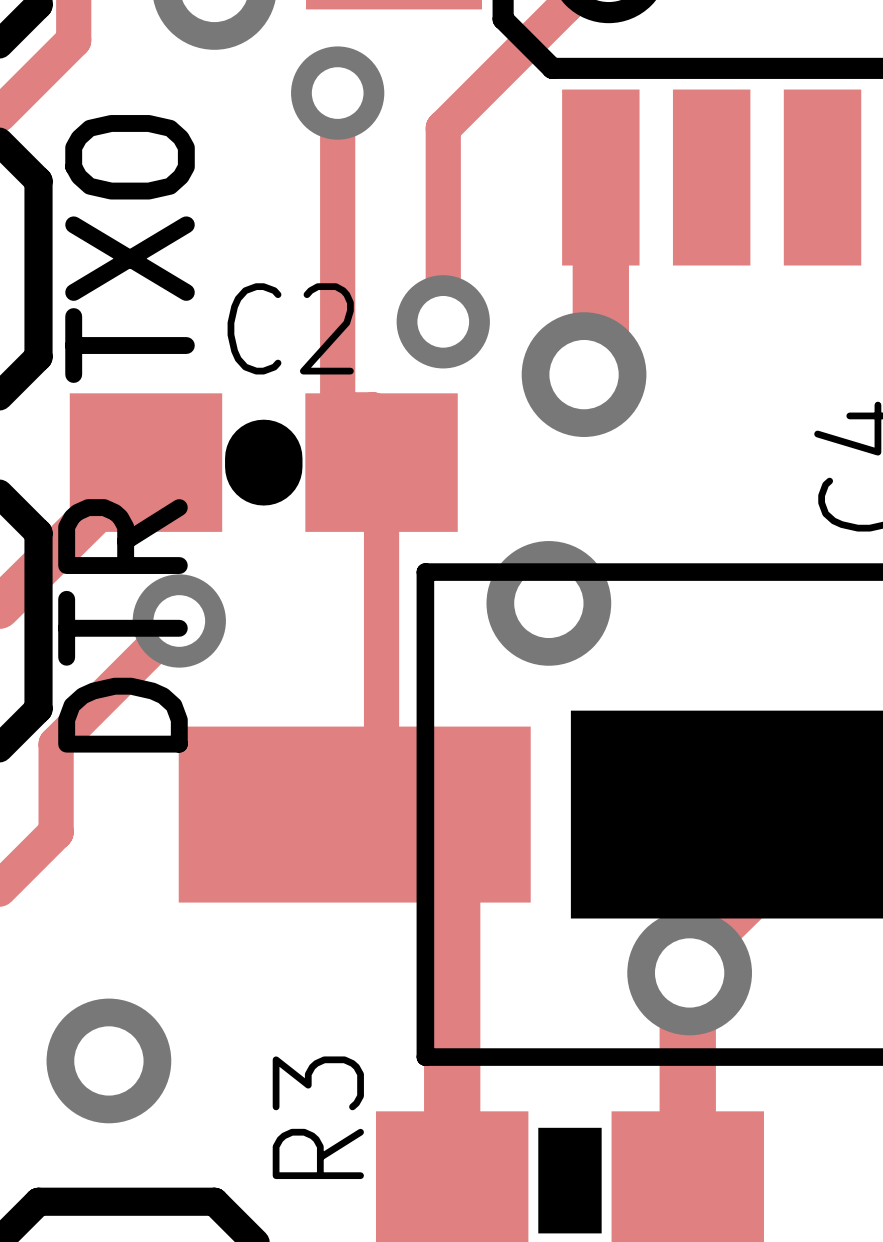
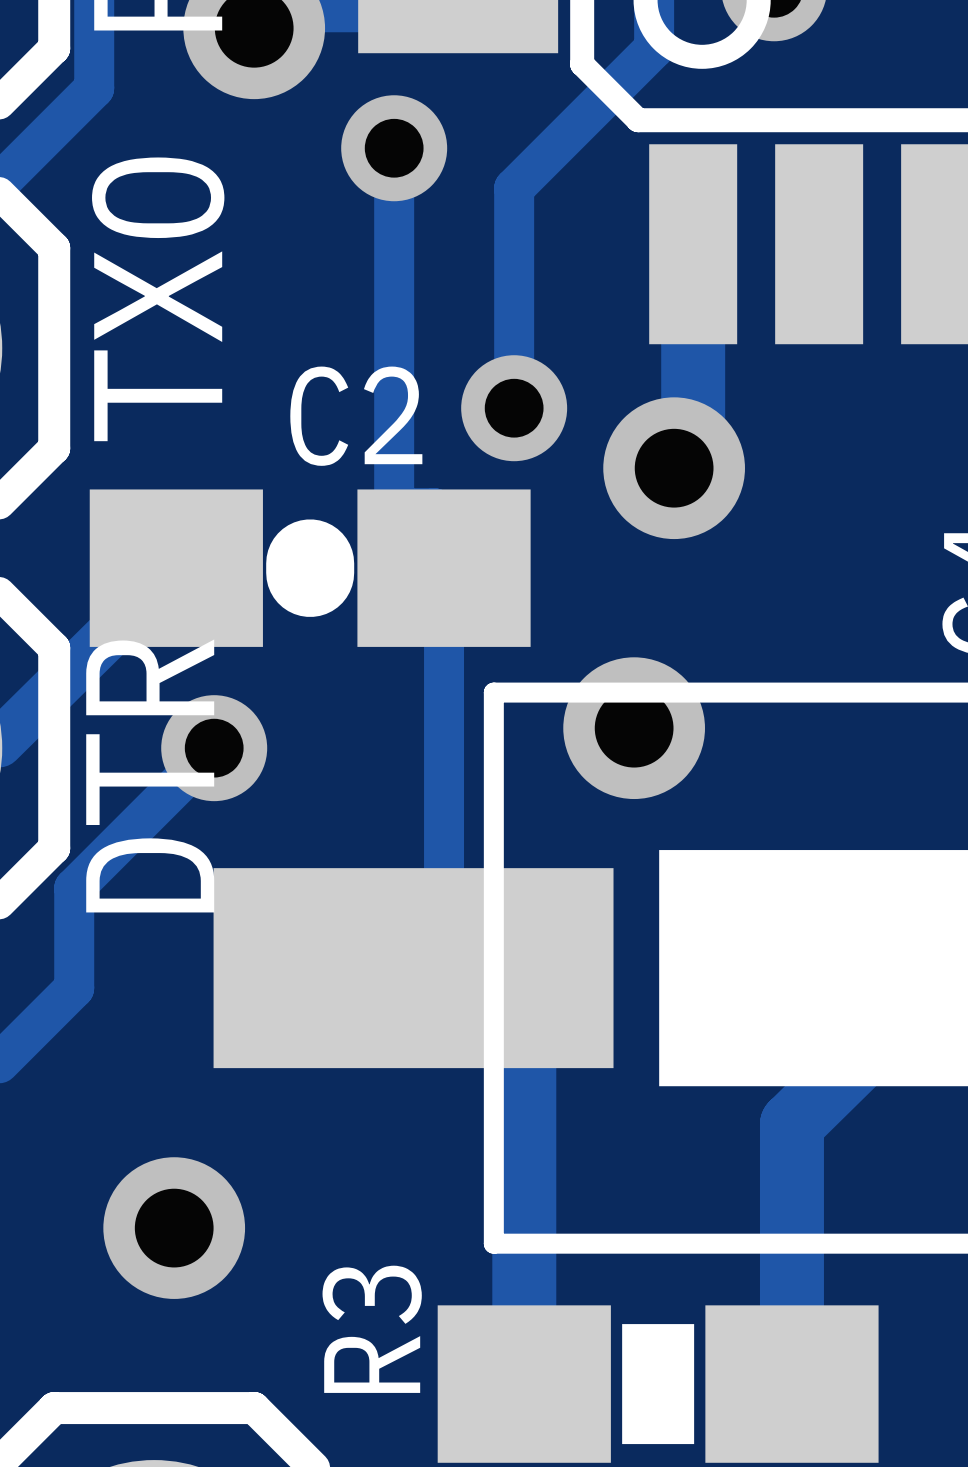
via: (689, 972) -> none
via position: (108, 1060) -> (174, 1228)

